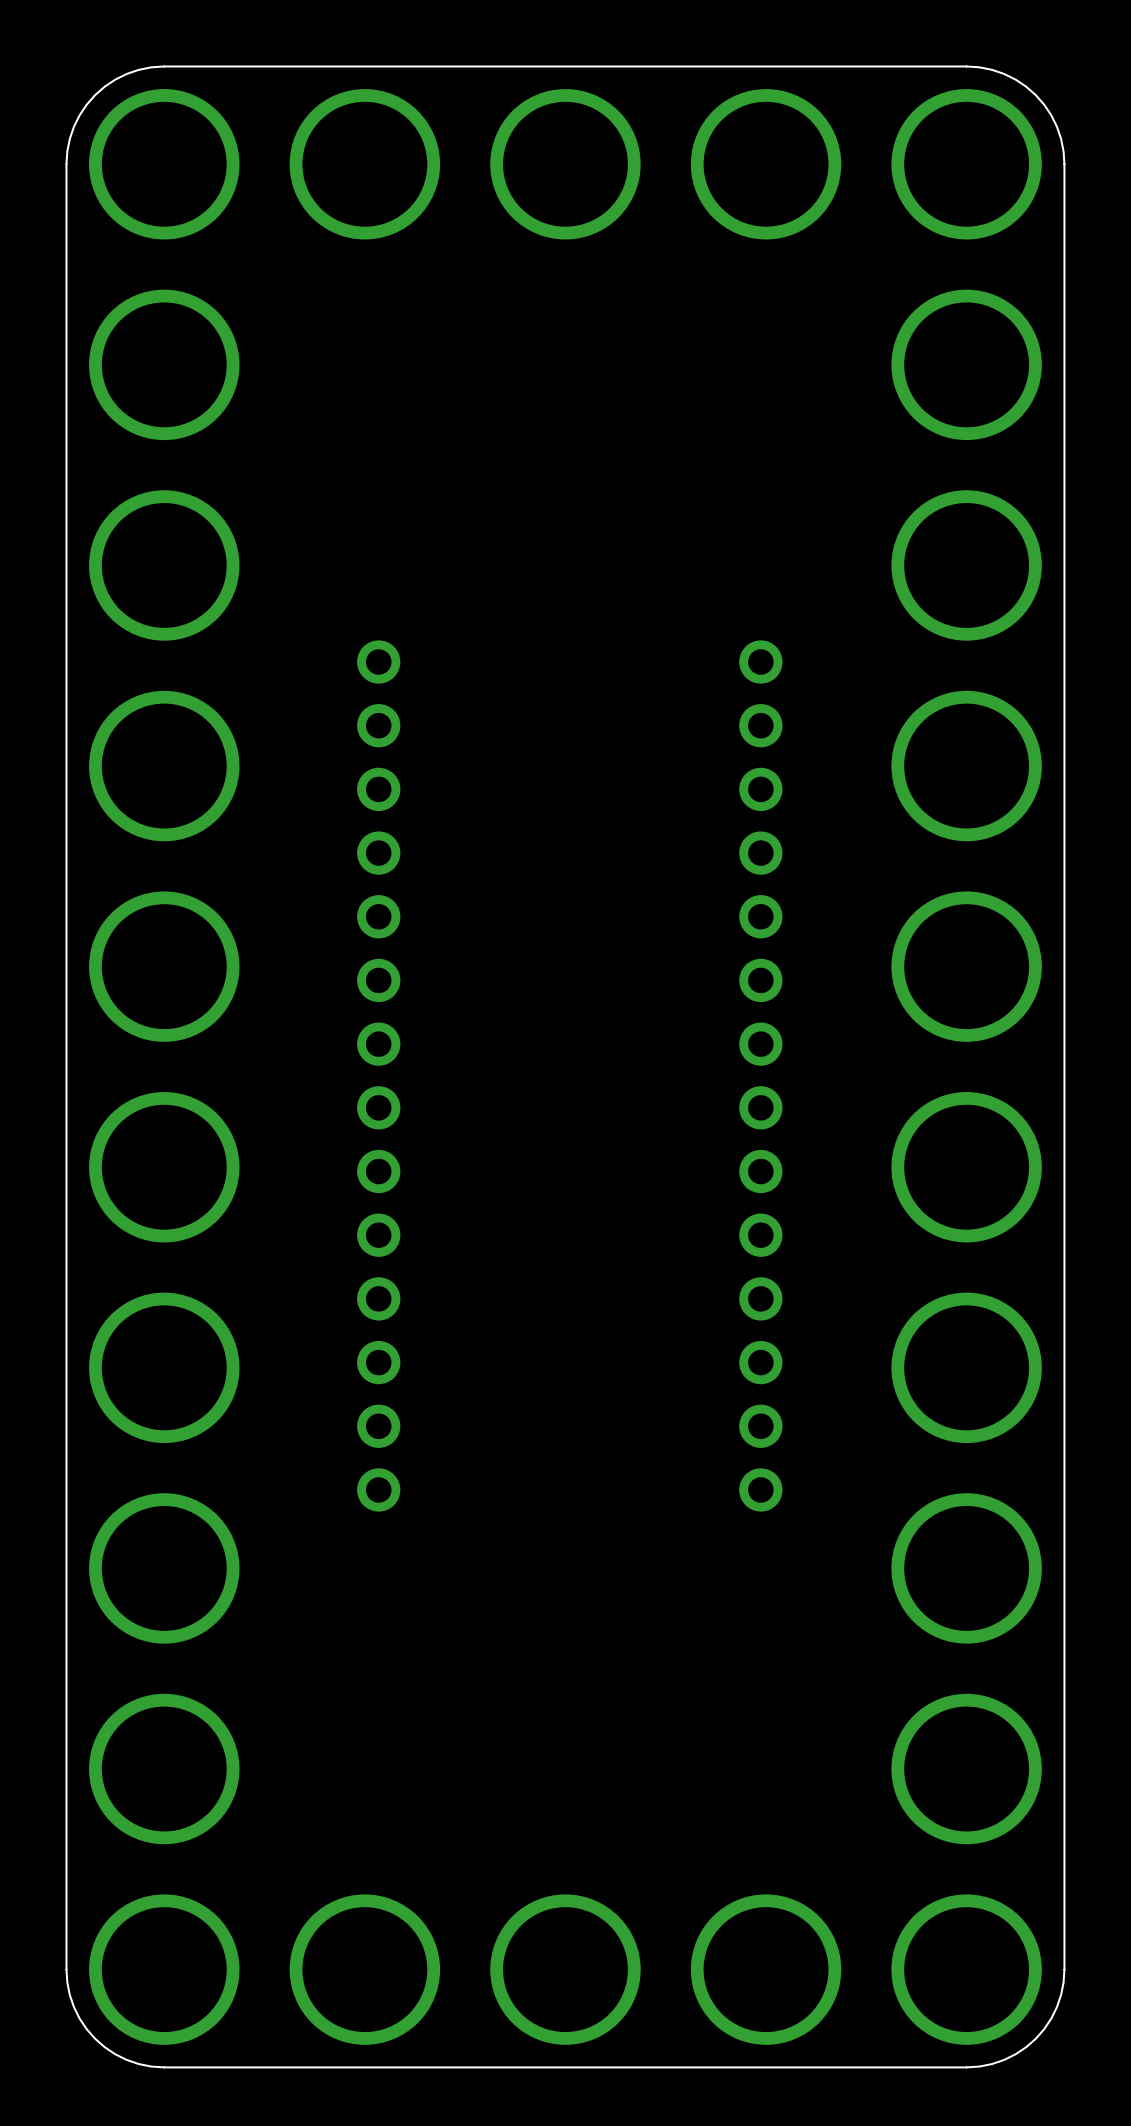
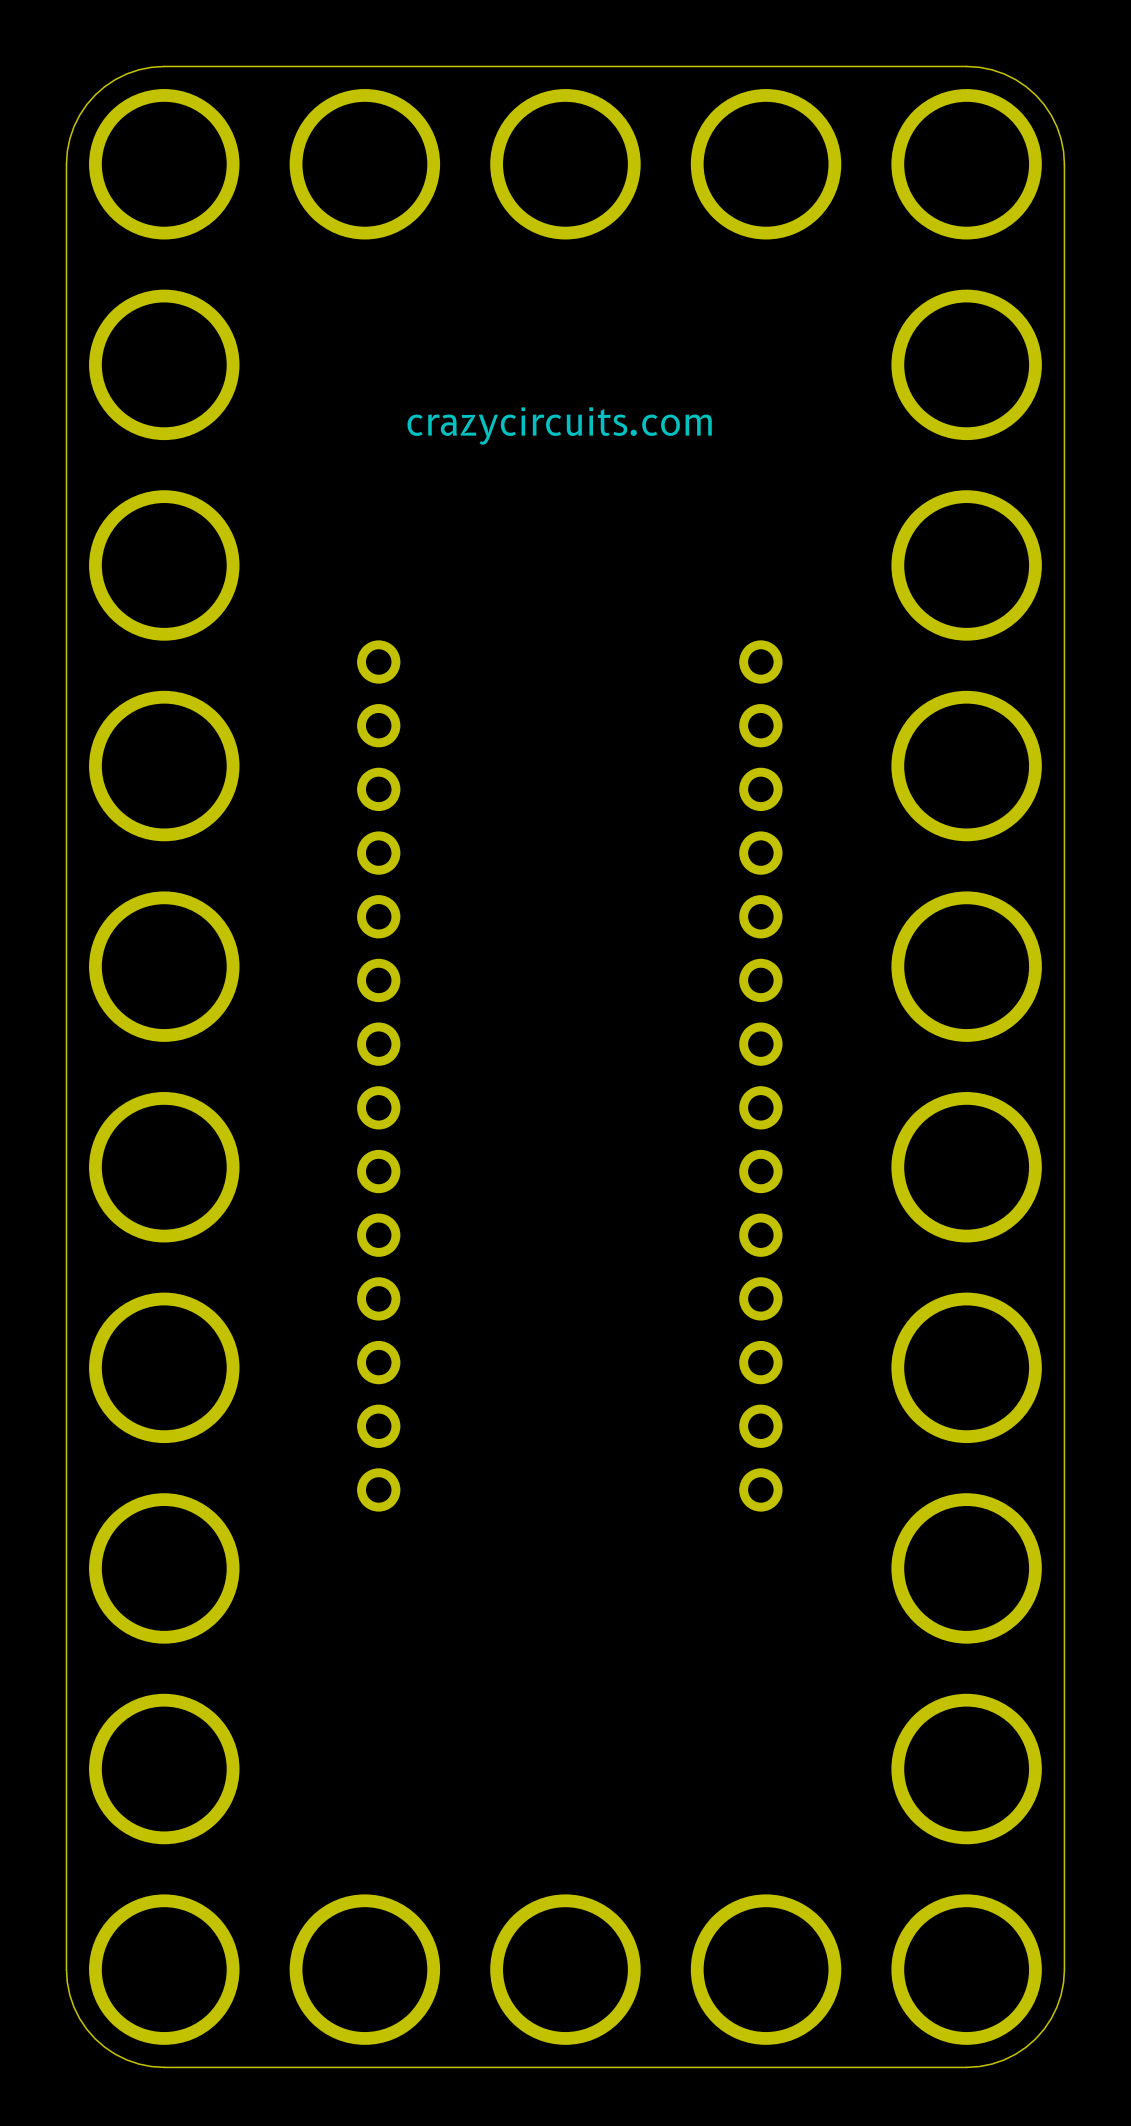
part: none -> (559, 426)

